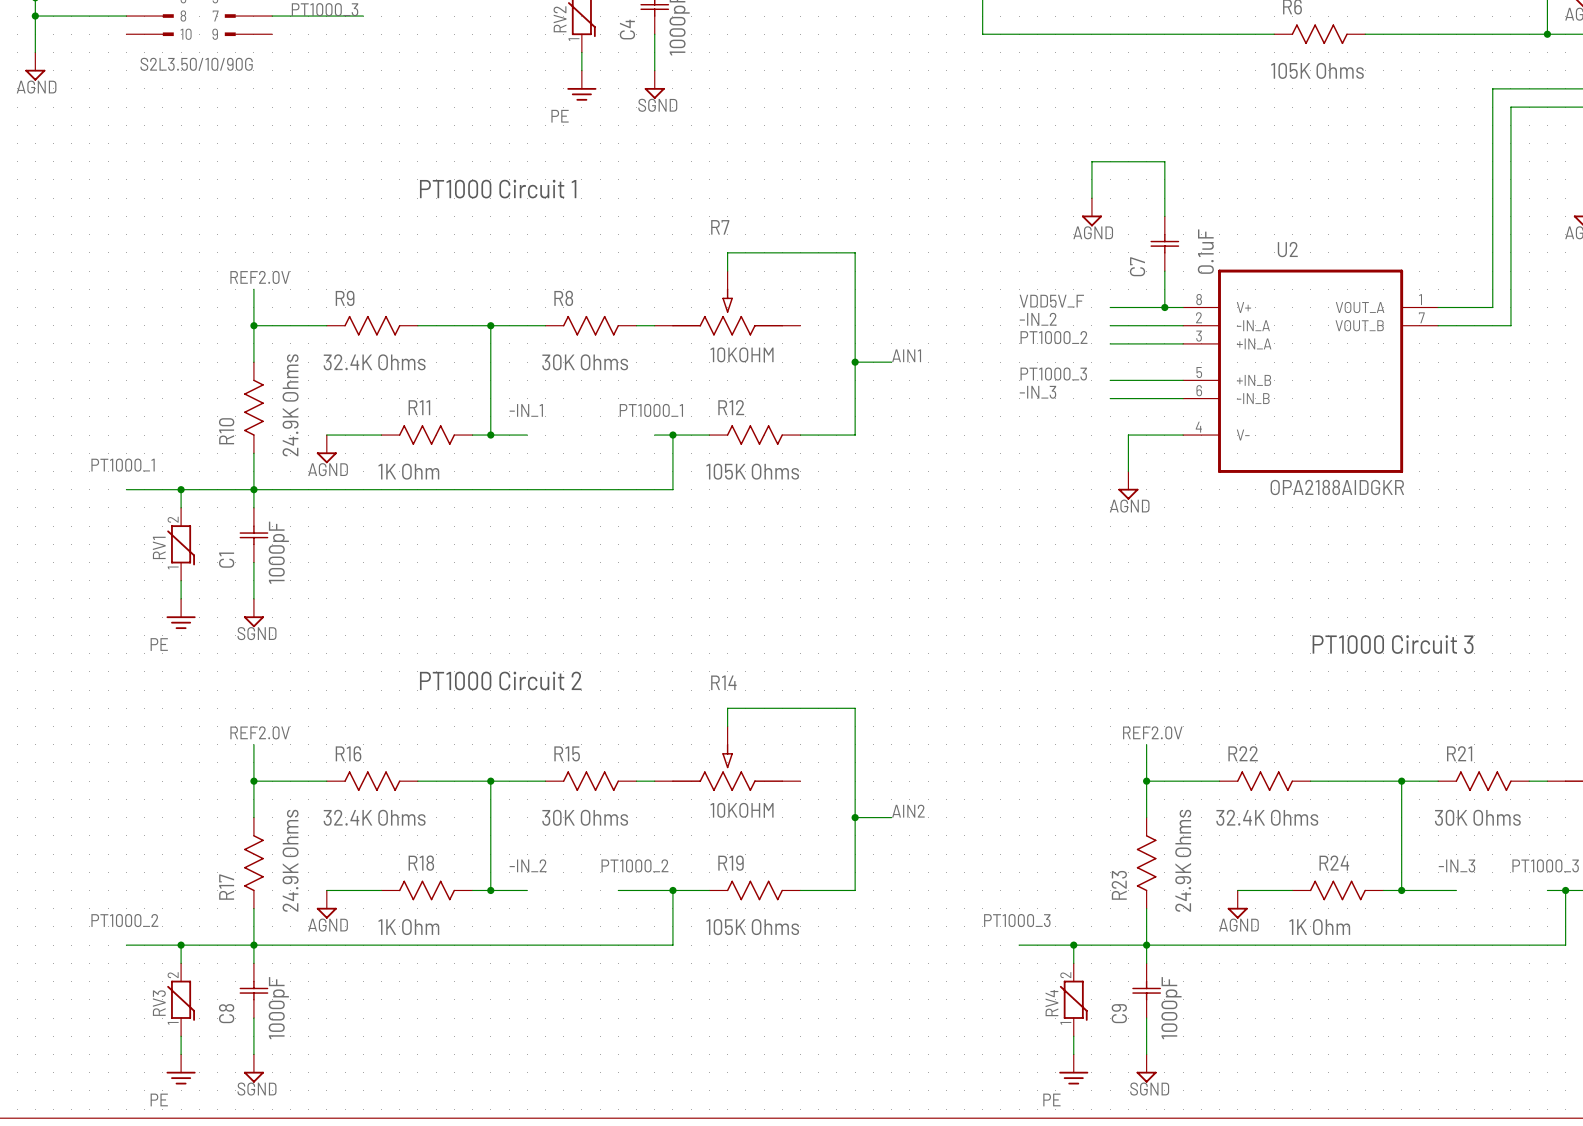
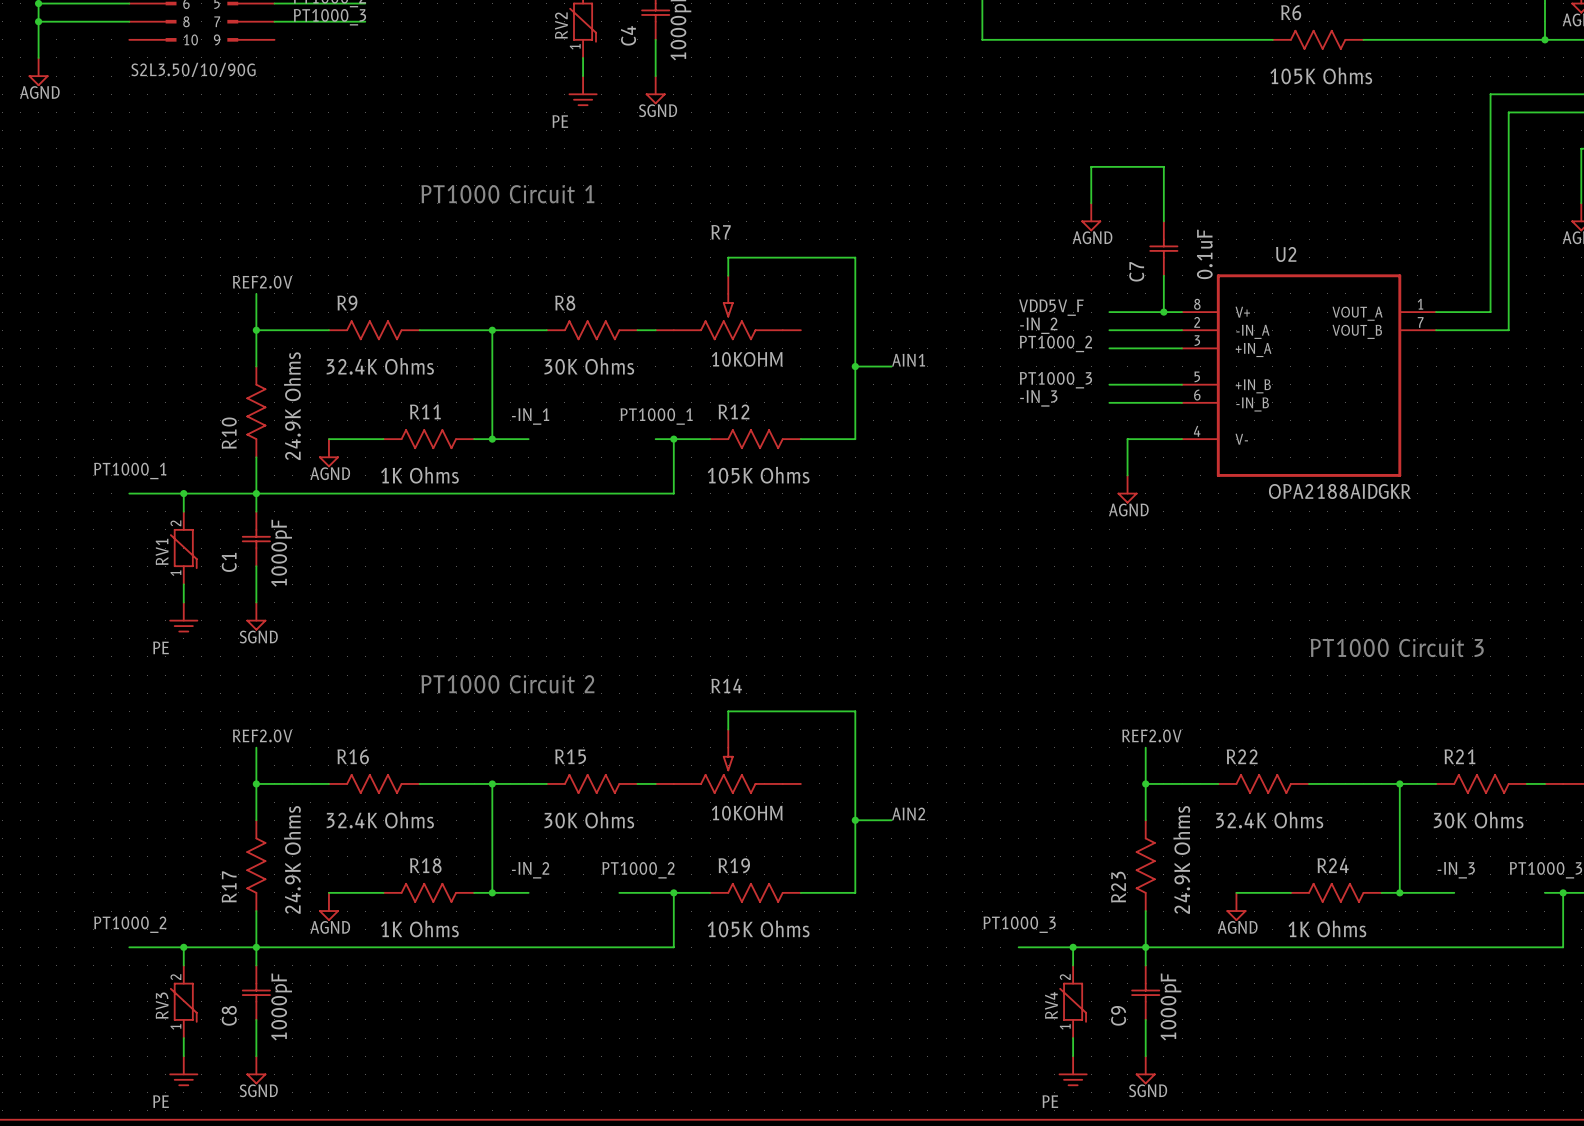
R11 value: 1K Ohm (408, 471) -> 1K Ohms (419, 475)
R18 value: 1K Ohm (408, 927) -> 1K Ohms (419, 928)
R24 value: 1K Ohm (1319, 927) -> 1K Ohms (1327, 928)

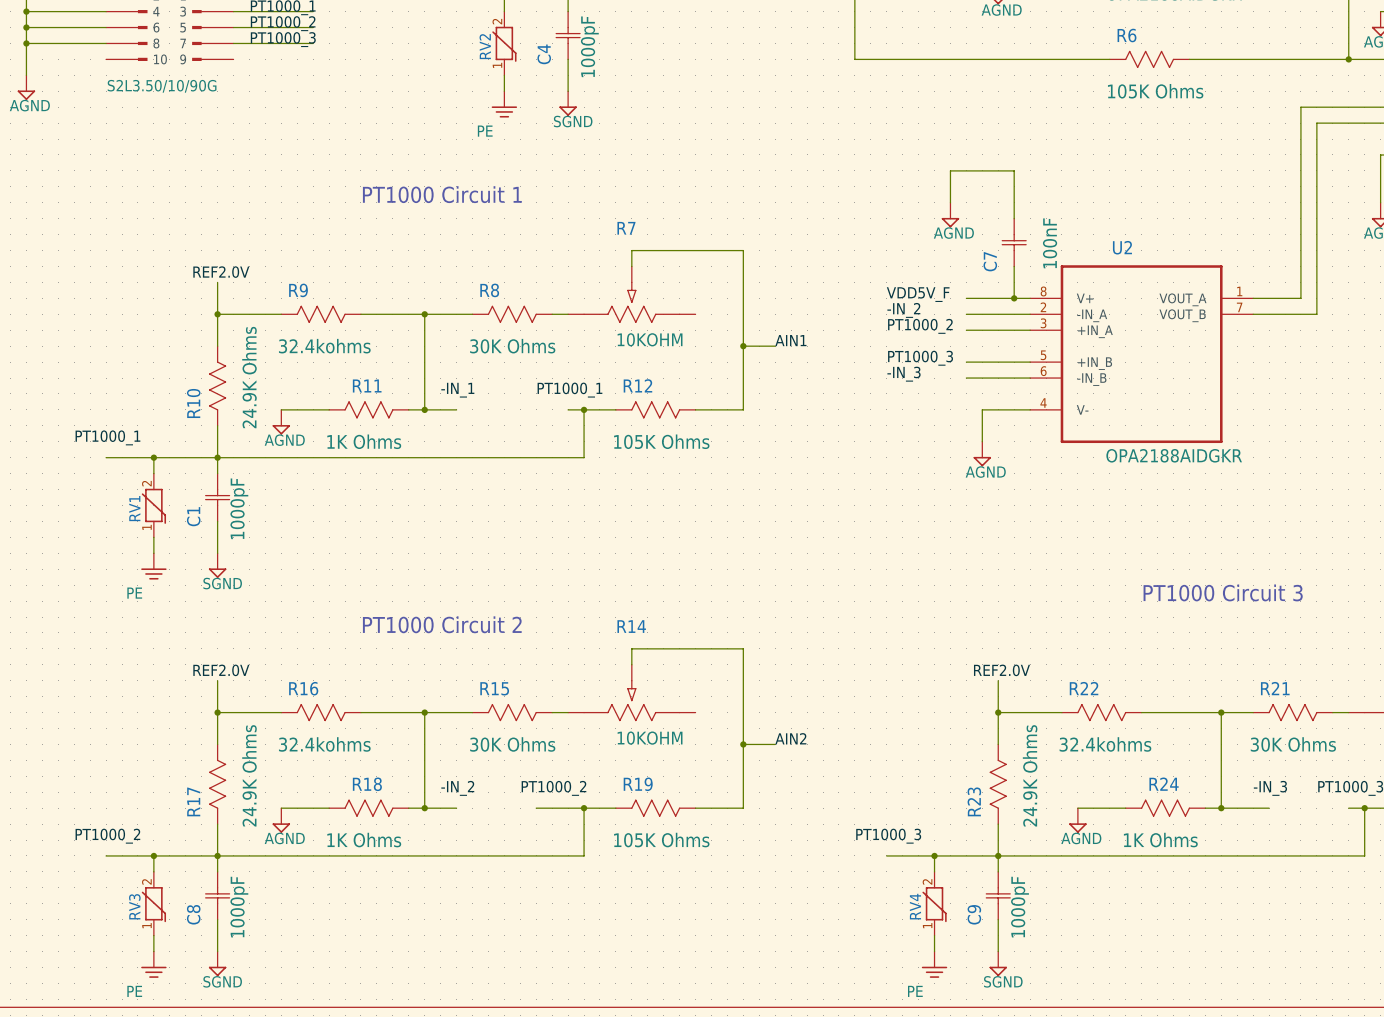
C7 value: 0.1uF (1204, 254) -> 100nF (1050, 243)
R9 value: 32.4K Ohms (380, 366) -> 32.4kohms (324, 346)
R16 value: 32.4K Ohms (380, 820) -> 32.4kohms (324, 744)
R22 value: 32.4K Ohms (1269, 820) -> 32.4kohms (1105, 744)

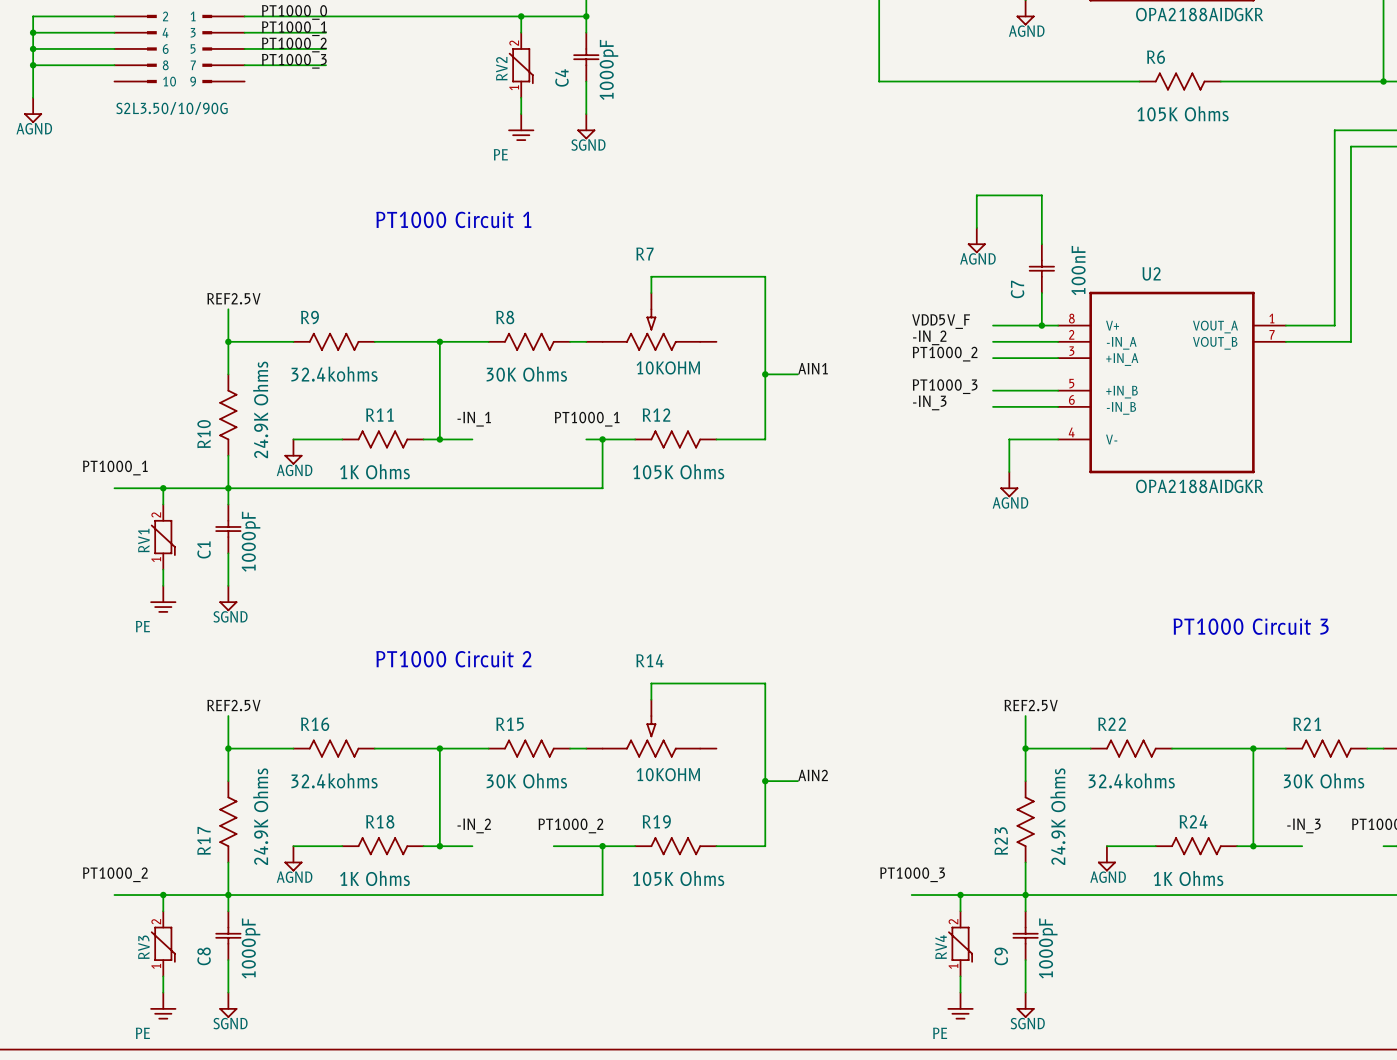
label: REF2.0V (221, 272) -> REF2.5V (233, 298)
label: REF2.0V (221, 670) -> REF2.5V (233, 705)
label: REF2.0V (1001, 670) -> REF2.5V (1031, 705)

